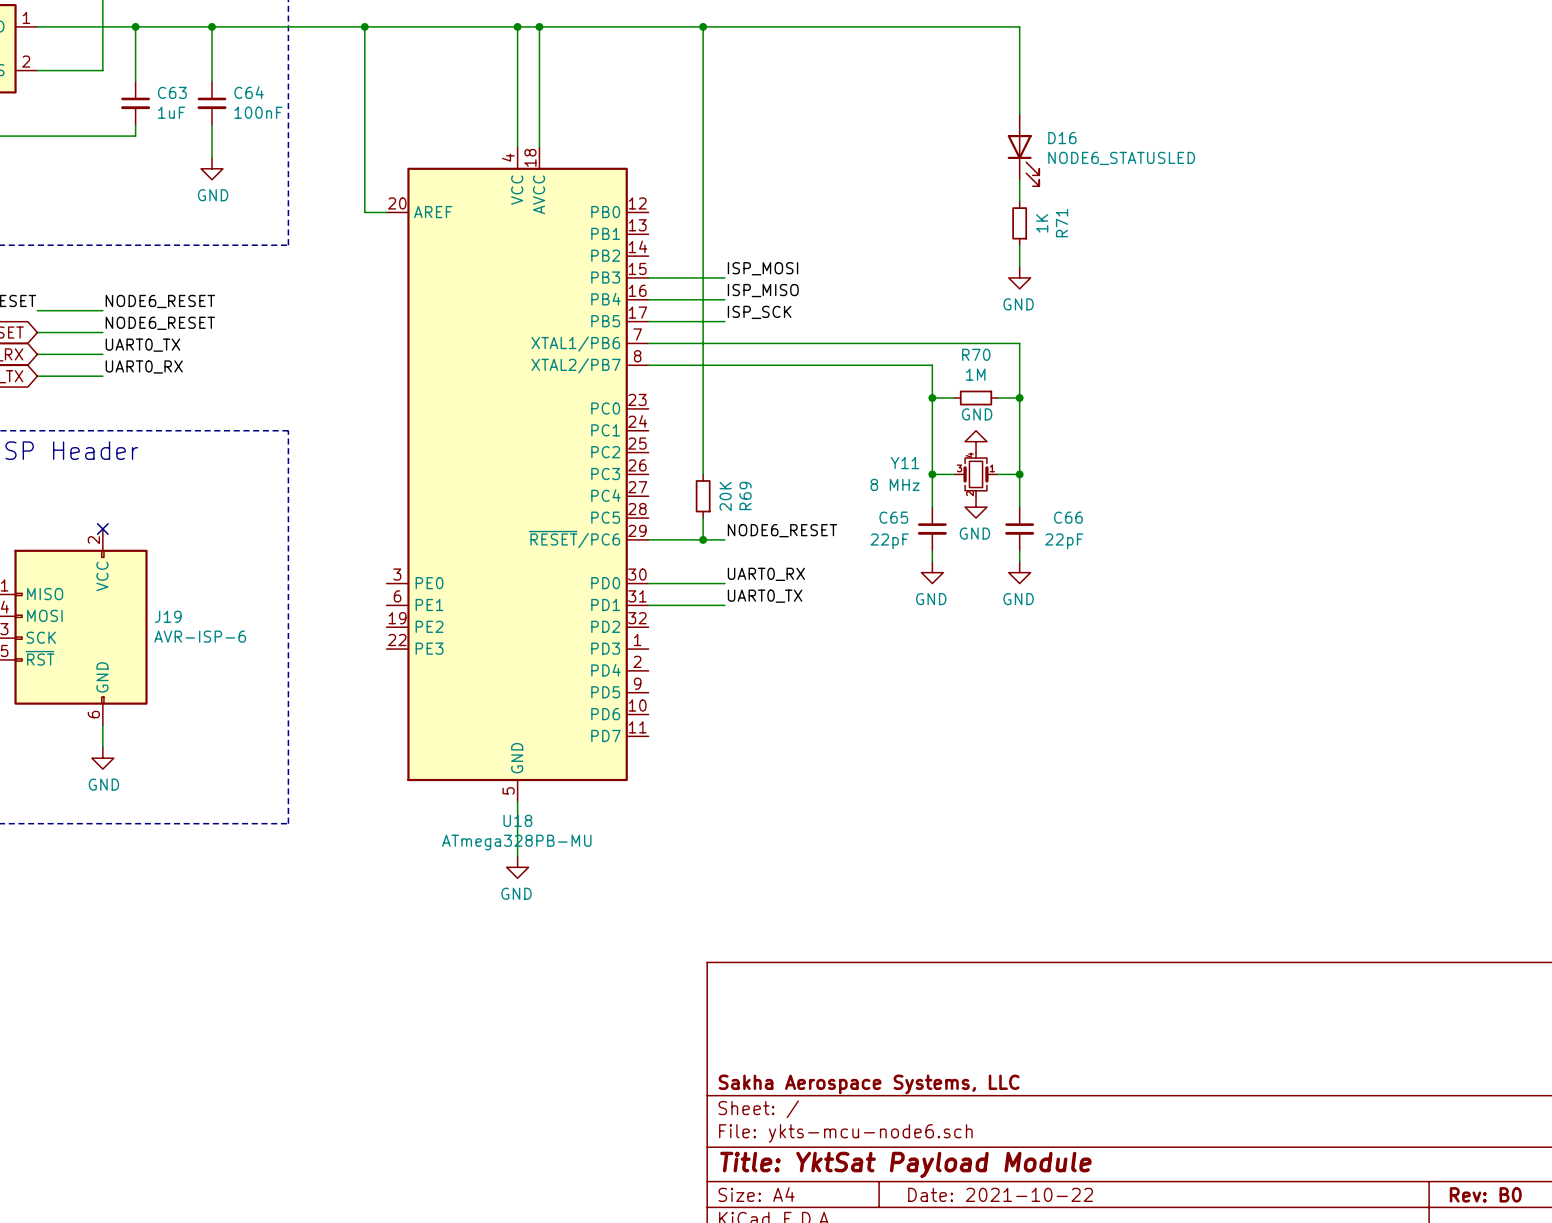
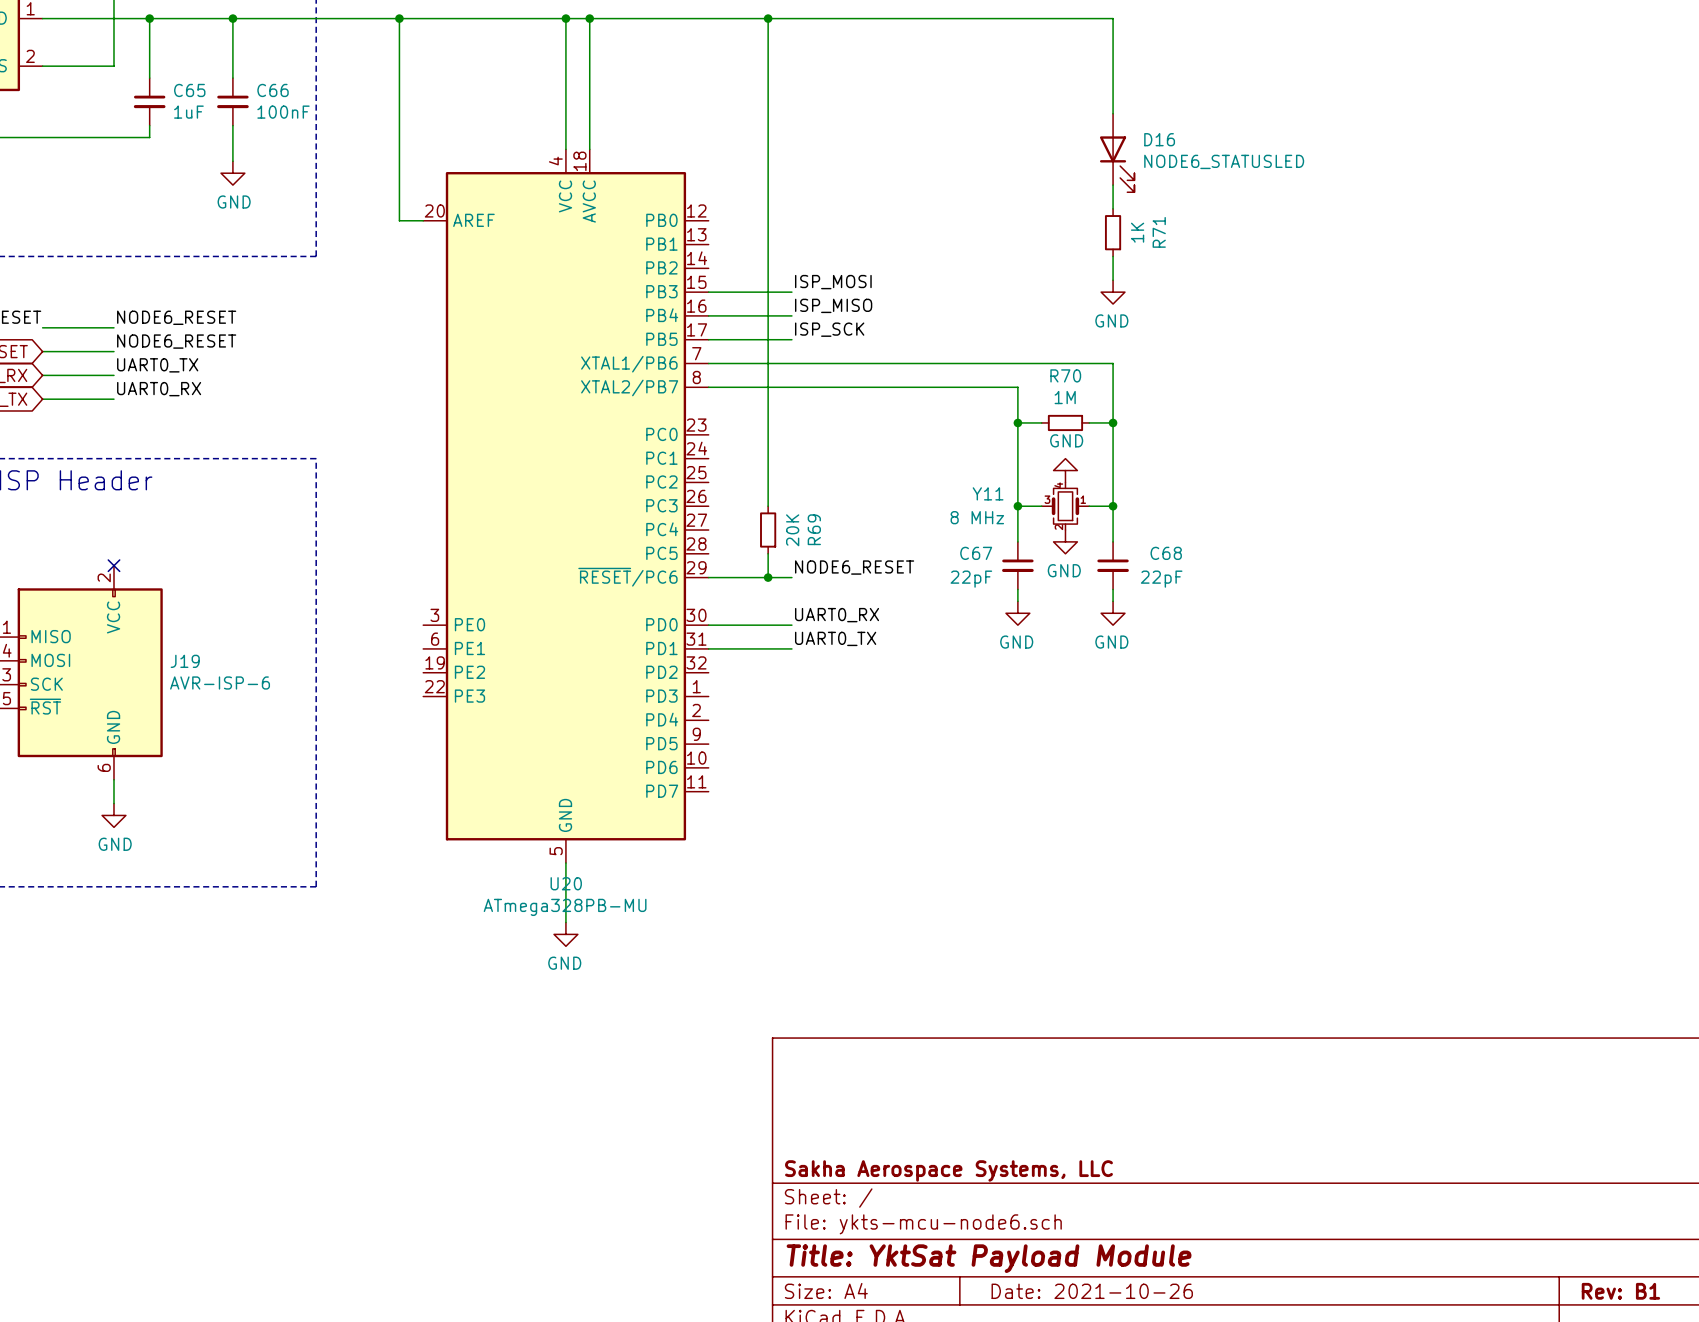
C63 name: C63 (172, 92) -> C65 (189, 90)
C64 name: C64 (249, 92) -> C66 (273, 90)
C65 name: C65 (893, 517) -> C67 (976, 553)
C66 name: C66 (1068, 517) -> C68 (1166, 553)
U18 name: U18 (517, 820) -> U20 (566, 883)
title block: Date: 2021-10-22 (1000, 1194) -> Date: 2021-10-26 (1092, 1291)
title block: Rev: B0 (1485, 1194) -> Rev: B1 (1620, 1291)

